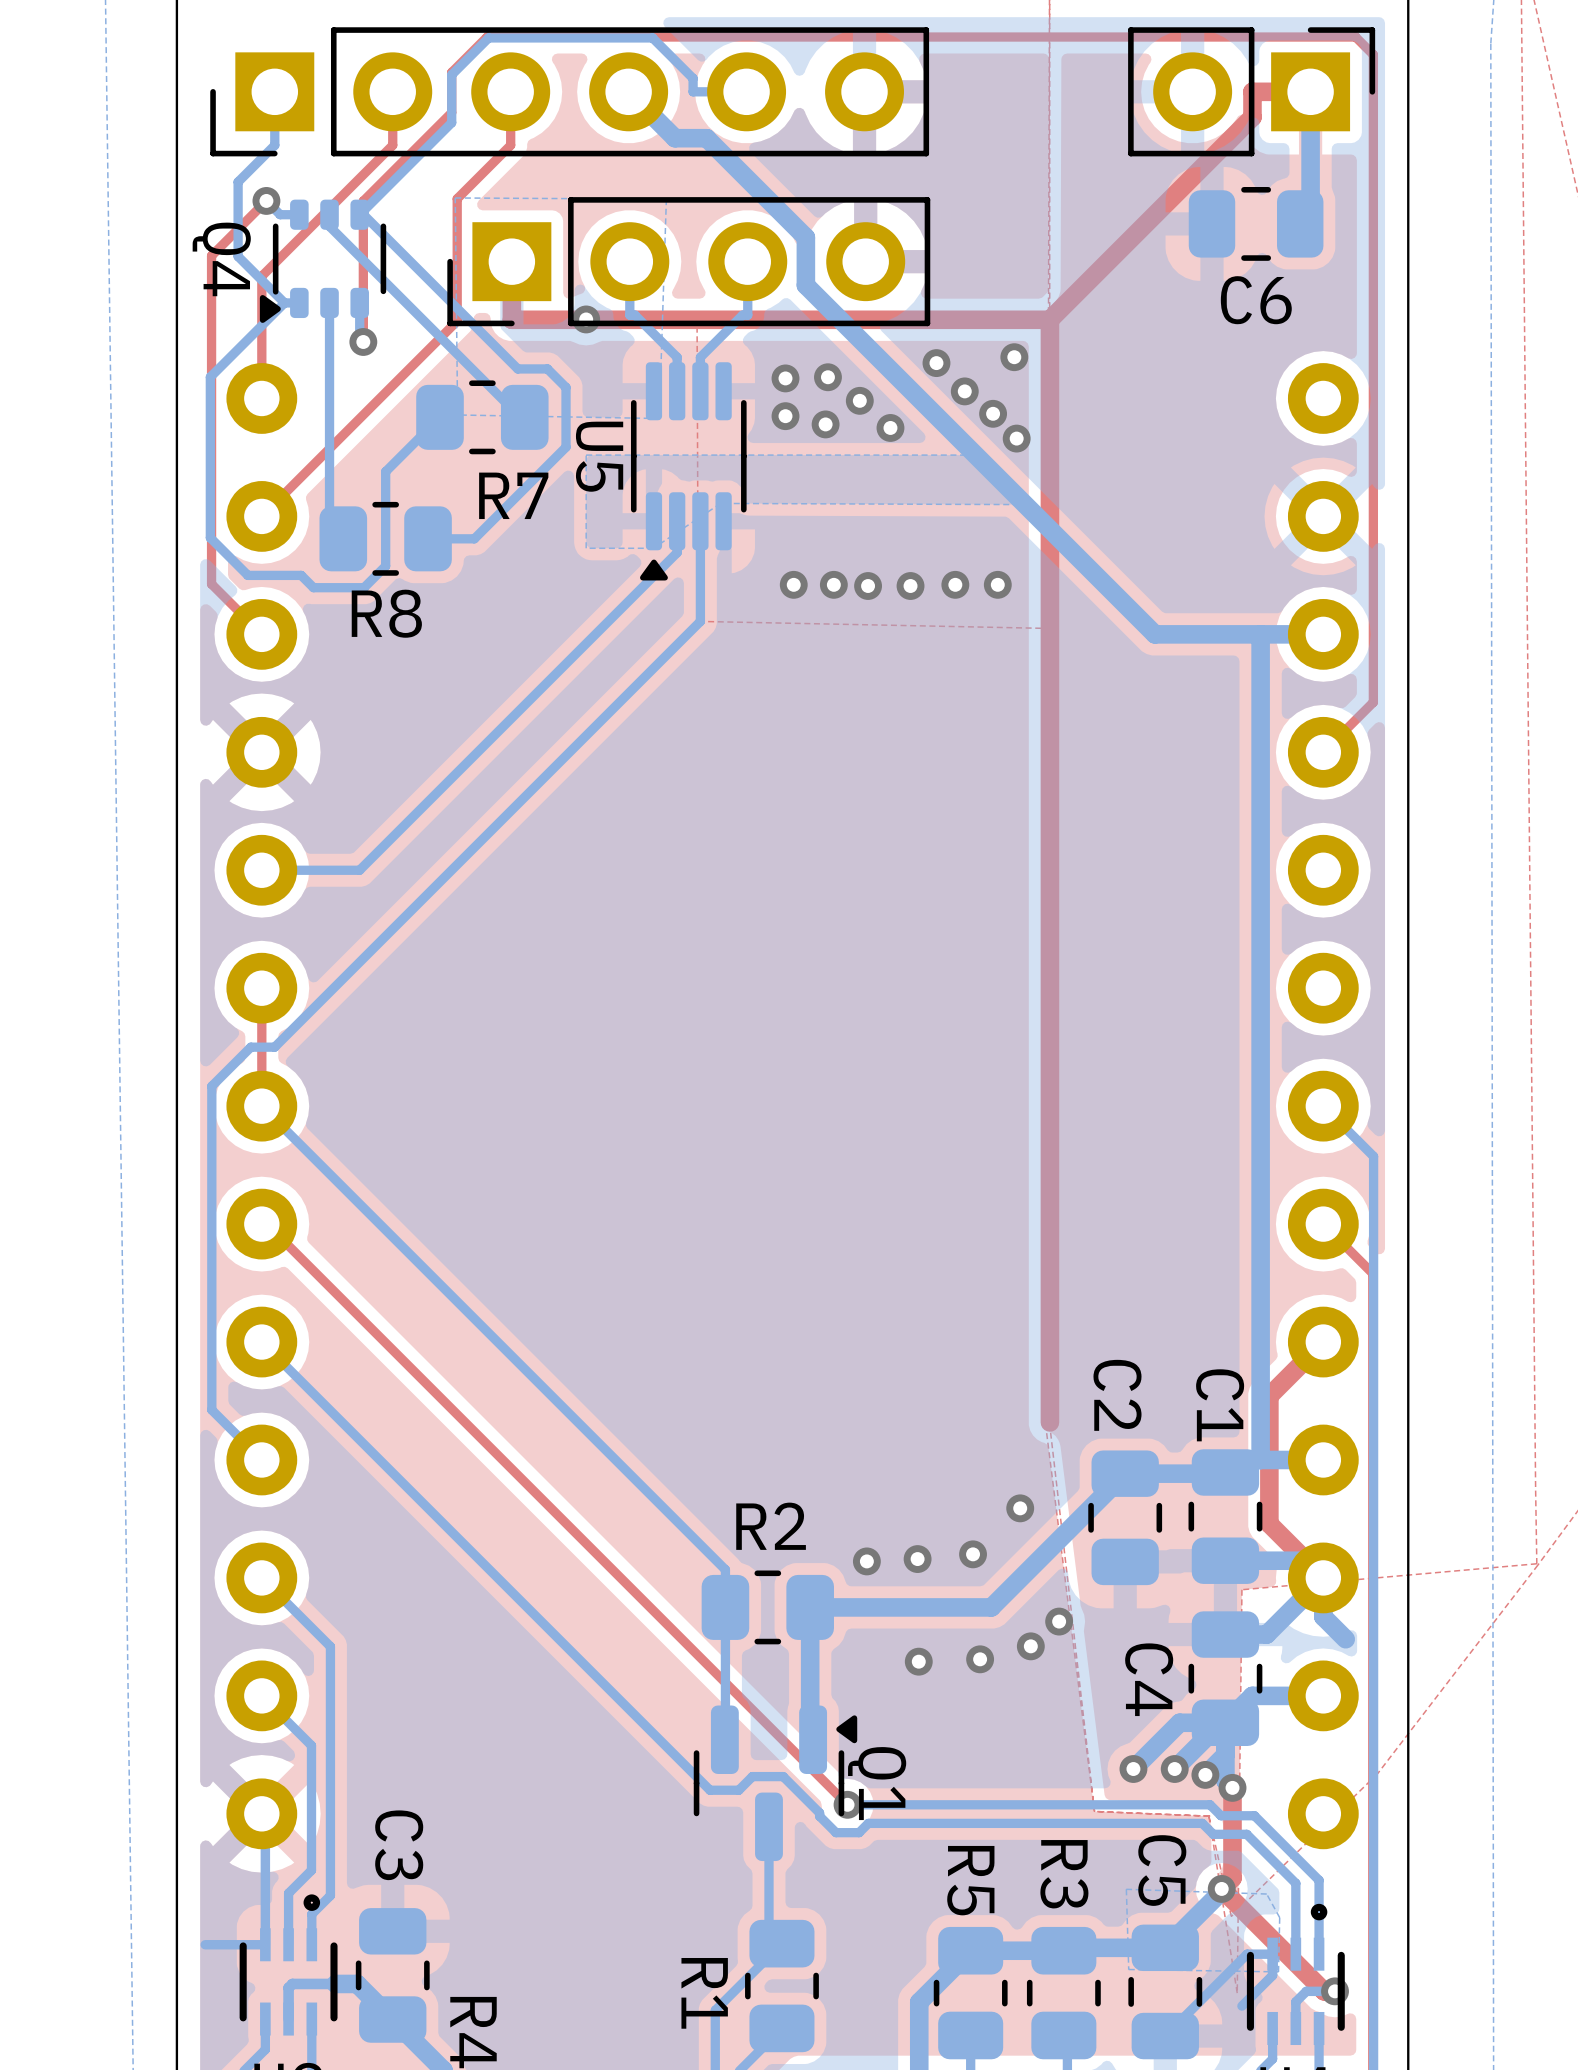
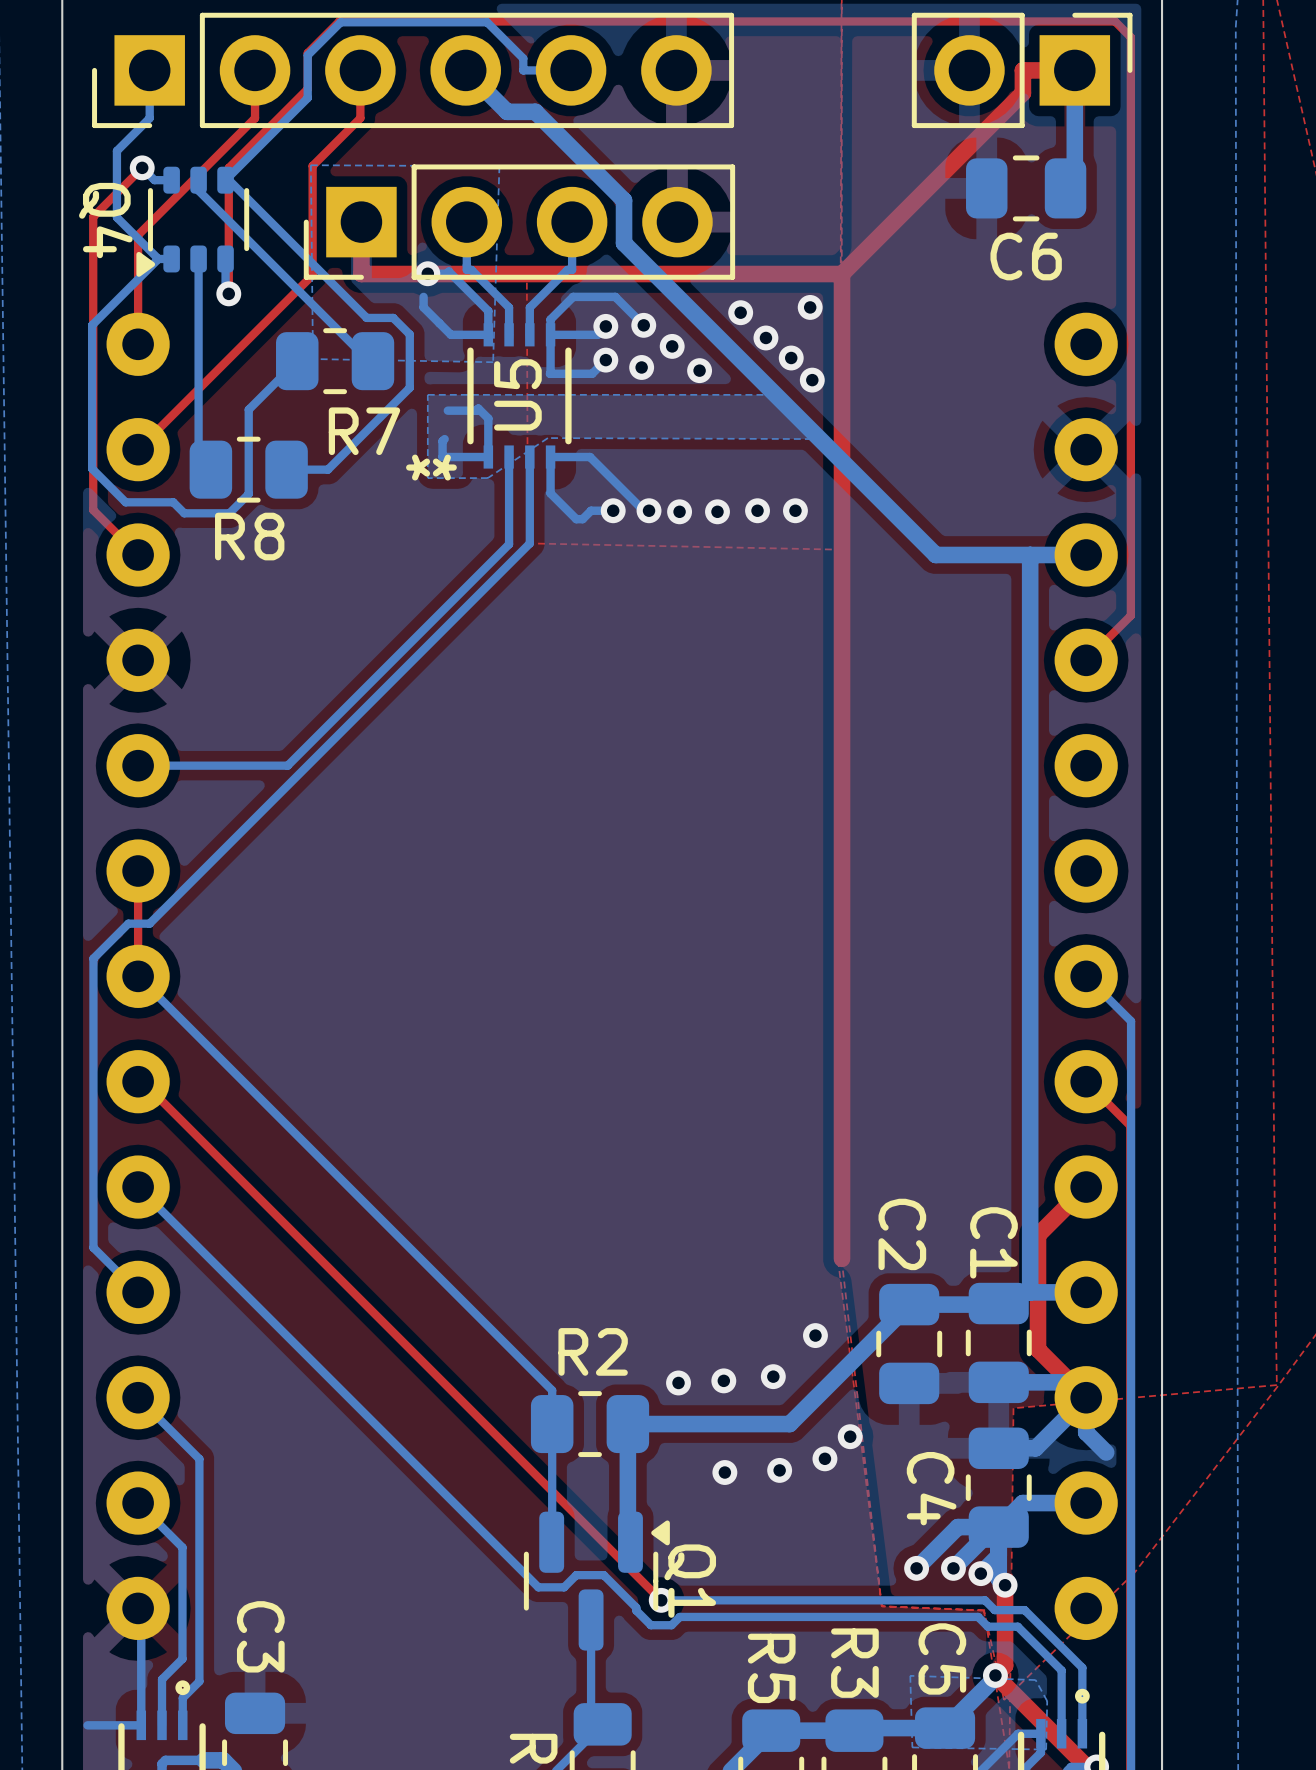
bottom track: none -> (427, 273) (446, 273) (448, 271) (488, 311) (488, 334) (450, 334) (423, 307) (423, 296)
U5 footprint: [630, 362, 747, 581] -> [467, 323, 572, 469]
bottom track: none -> (643, 325) (615, 296) (573, 296) (550, 319) (550, 373)
bottom track: none -> (605, 326) (597, 334) (550, 334)
bottom track: none -> (605, 360) (592, 373) (550, 373)
U5 name position: U5 (599, 456) -> U5 (517, 394)
bottom track: none -> (447, 410) (476, 410) (478, 408) (488, 418) (488, 457) (442, 457) (442, 441) (444, 439)
bottom track: (677, 552) (359, 870) -> (509, 482) (509, 544) (287, 765) (225, 765)
bottom track: none -> (649, 510) (643, 510) (590, 457) (550, 457) (550, 493) (576, 519) (582, 519) (591, 510) (613, 510)

